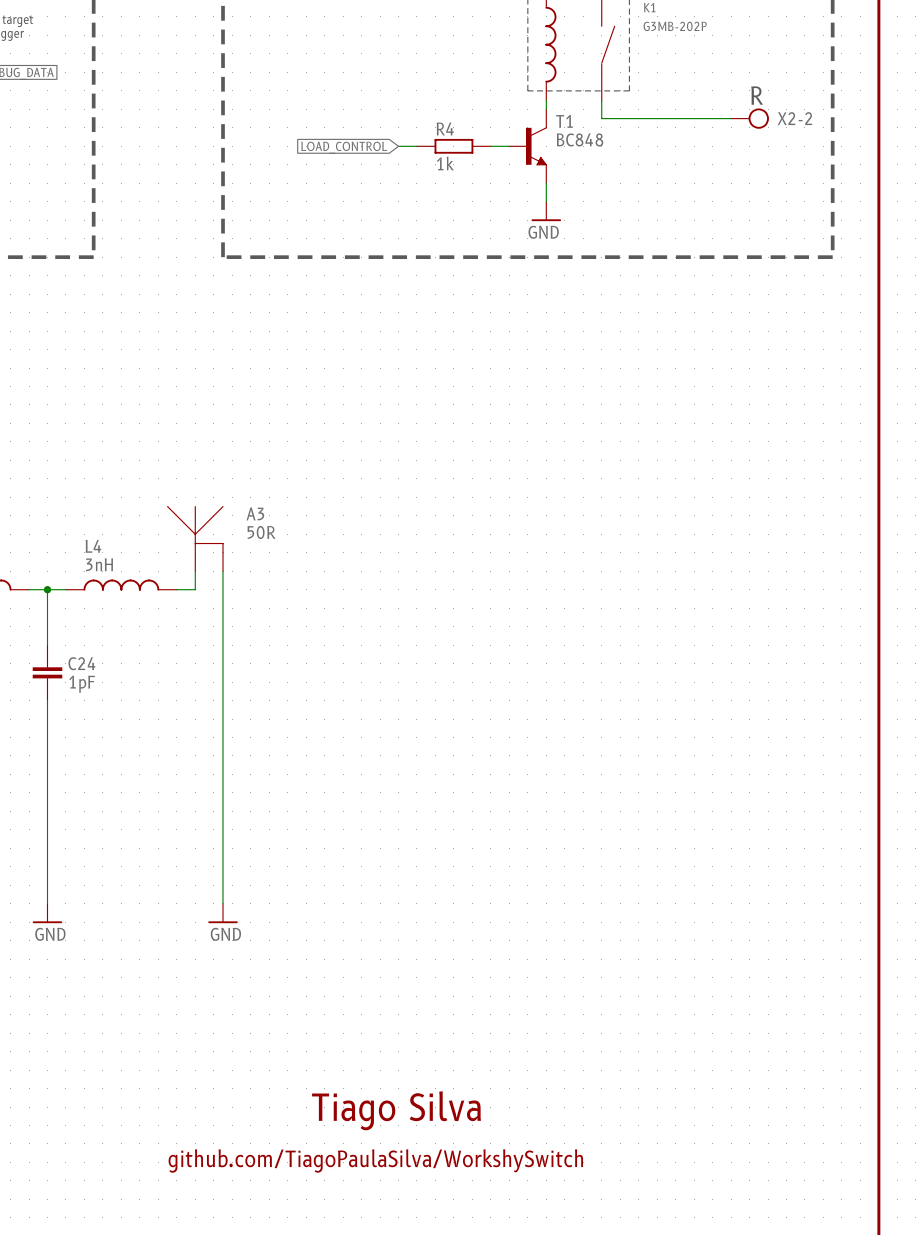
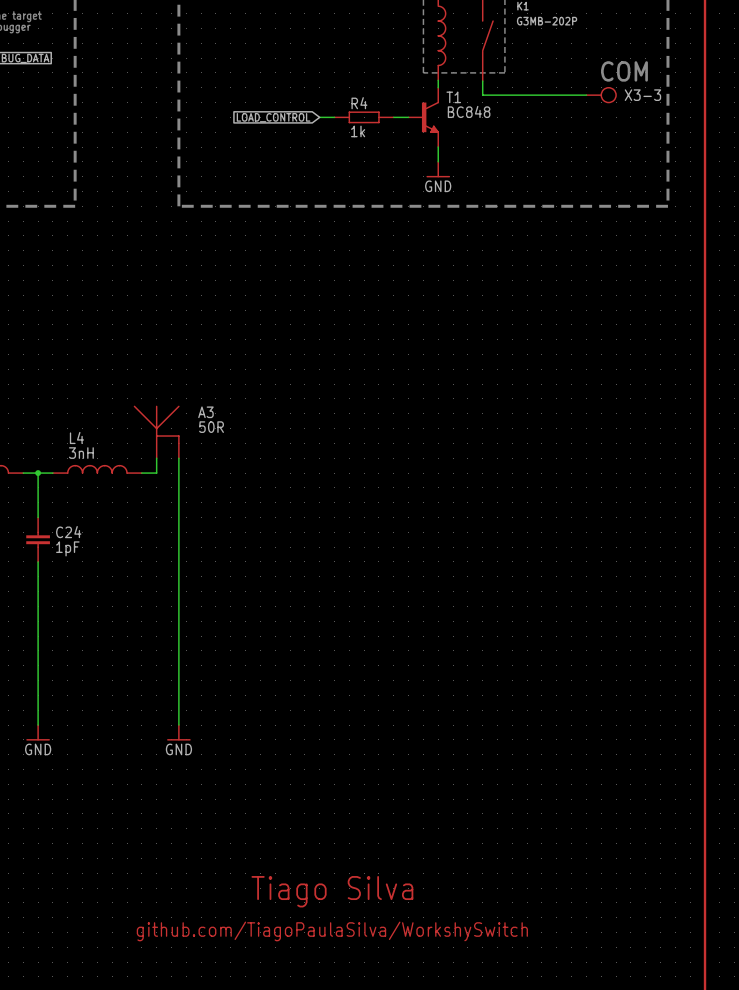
text: R (757, 95) -> COM (624, 71)
X2-2 name: X2-2 (794, 118) -> X3-3 (642, 95)

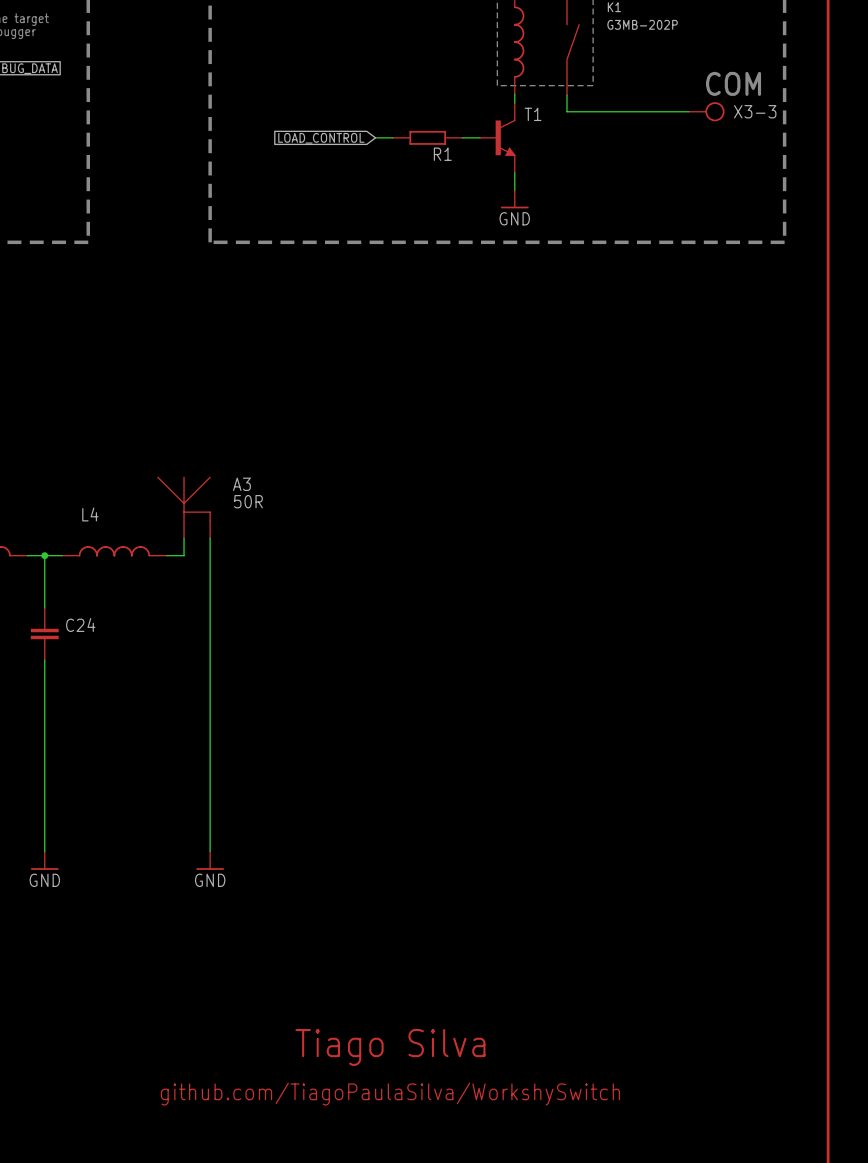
R4 name: R4 (359, 103) -> R1 (442, 154)
T1 value: BC848 (469, 111) -> none
R4 value: 1k (358, 131) -> none
L4 value: 3nH (81, 453) -> none
C24 value: 1pF (67, 548) -> none

